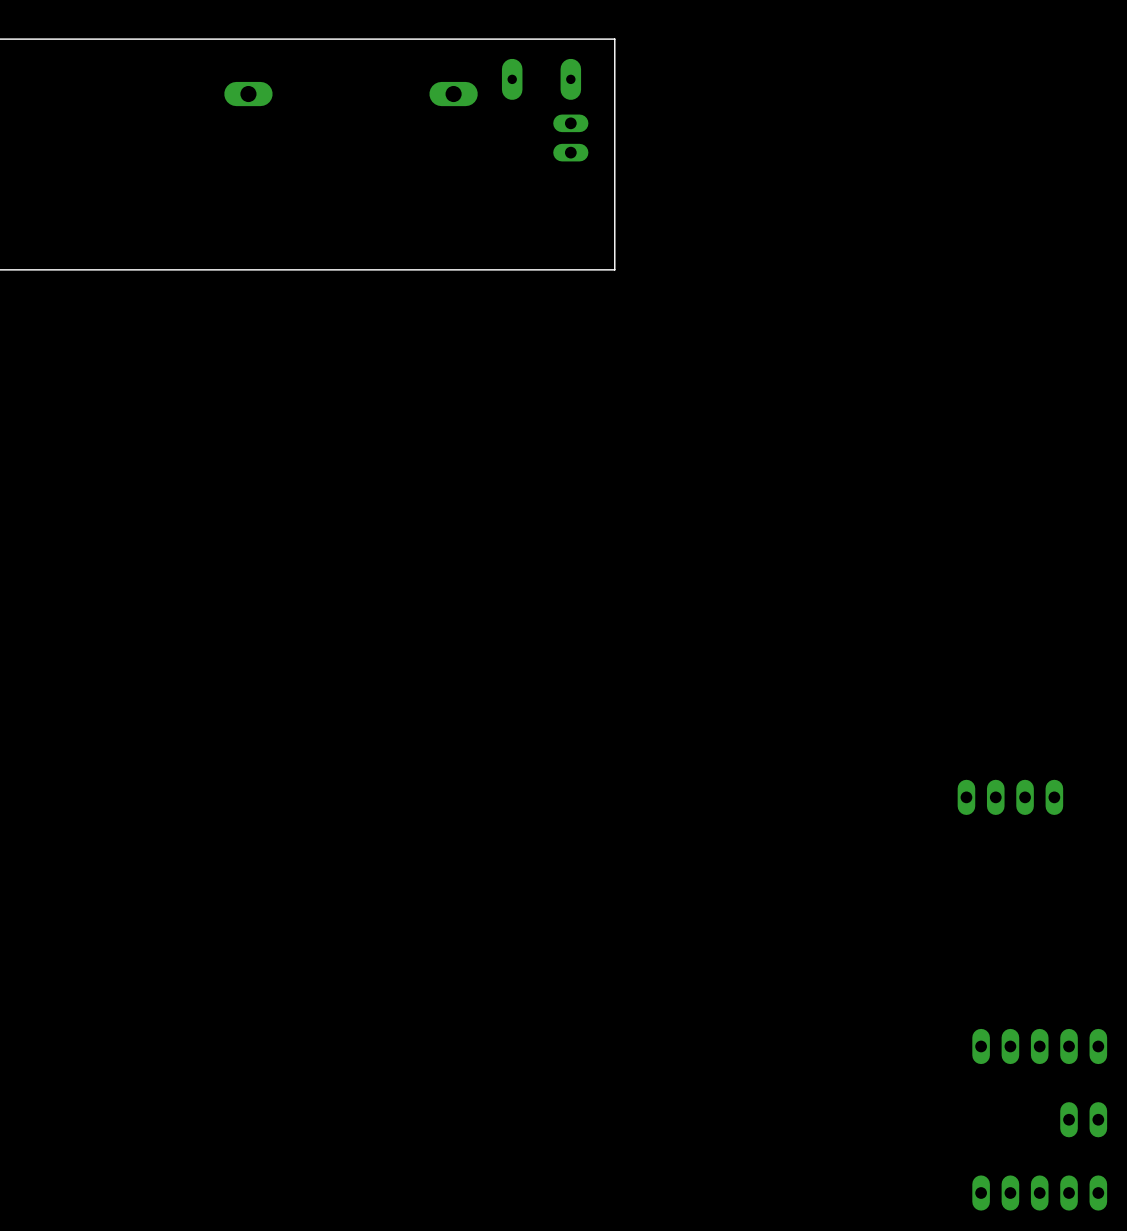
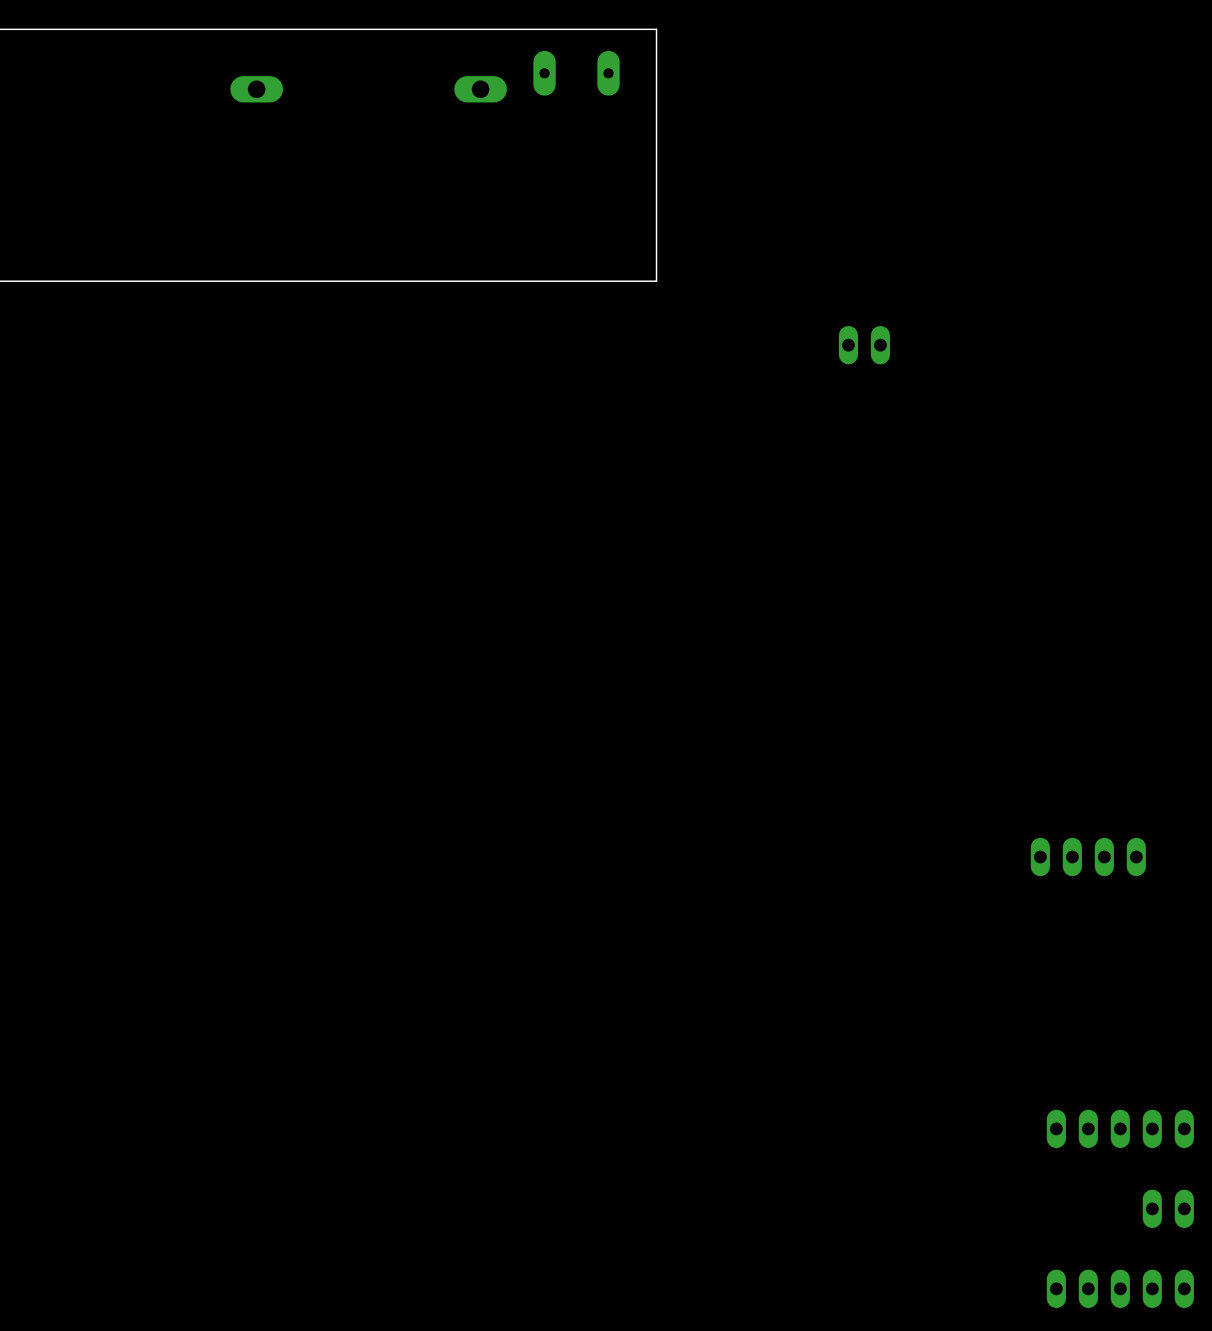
part: (570, 137) -> none
part: none -> (864, 345)

